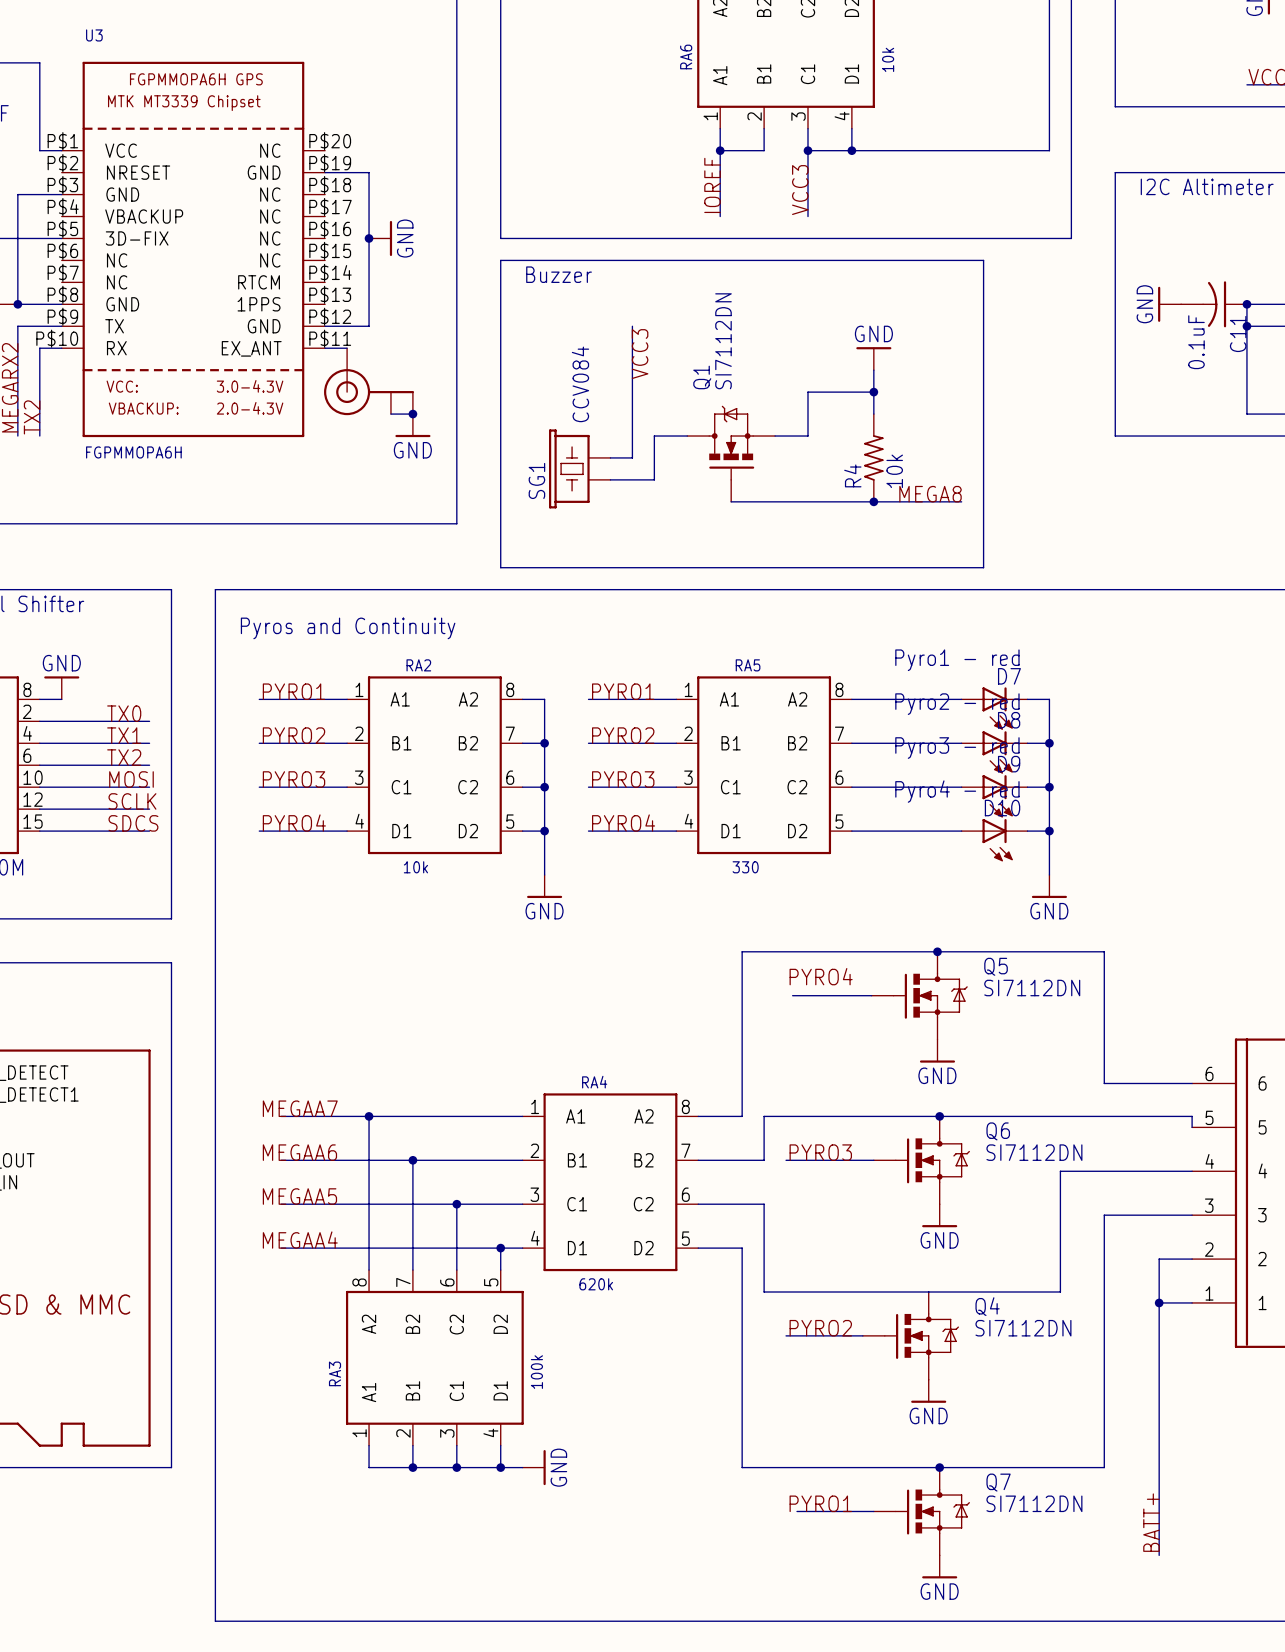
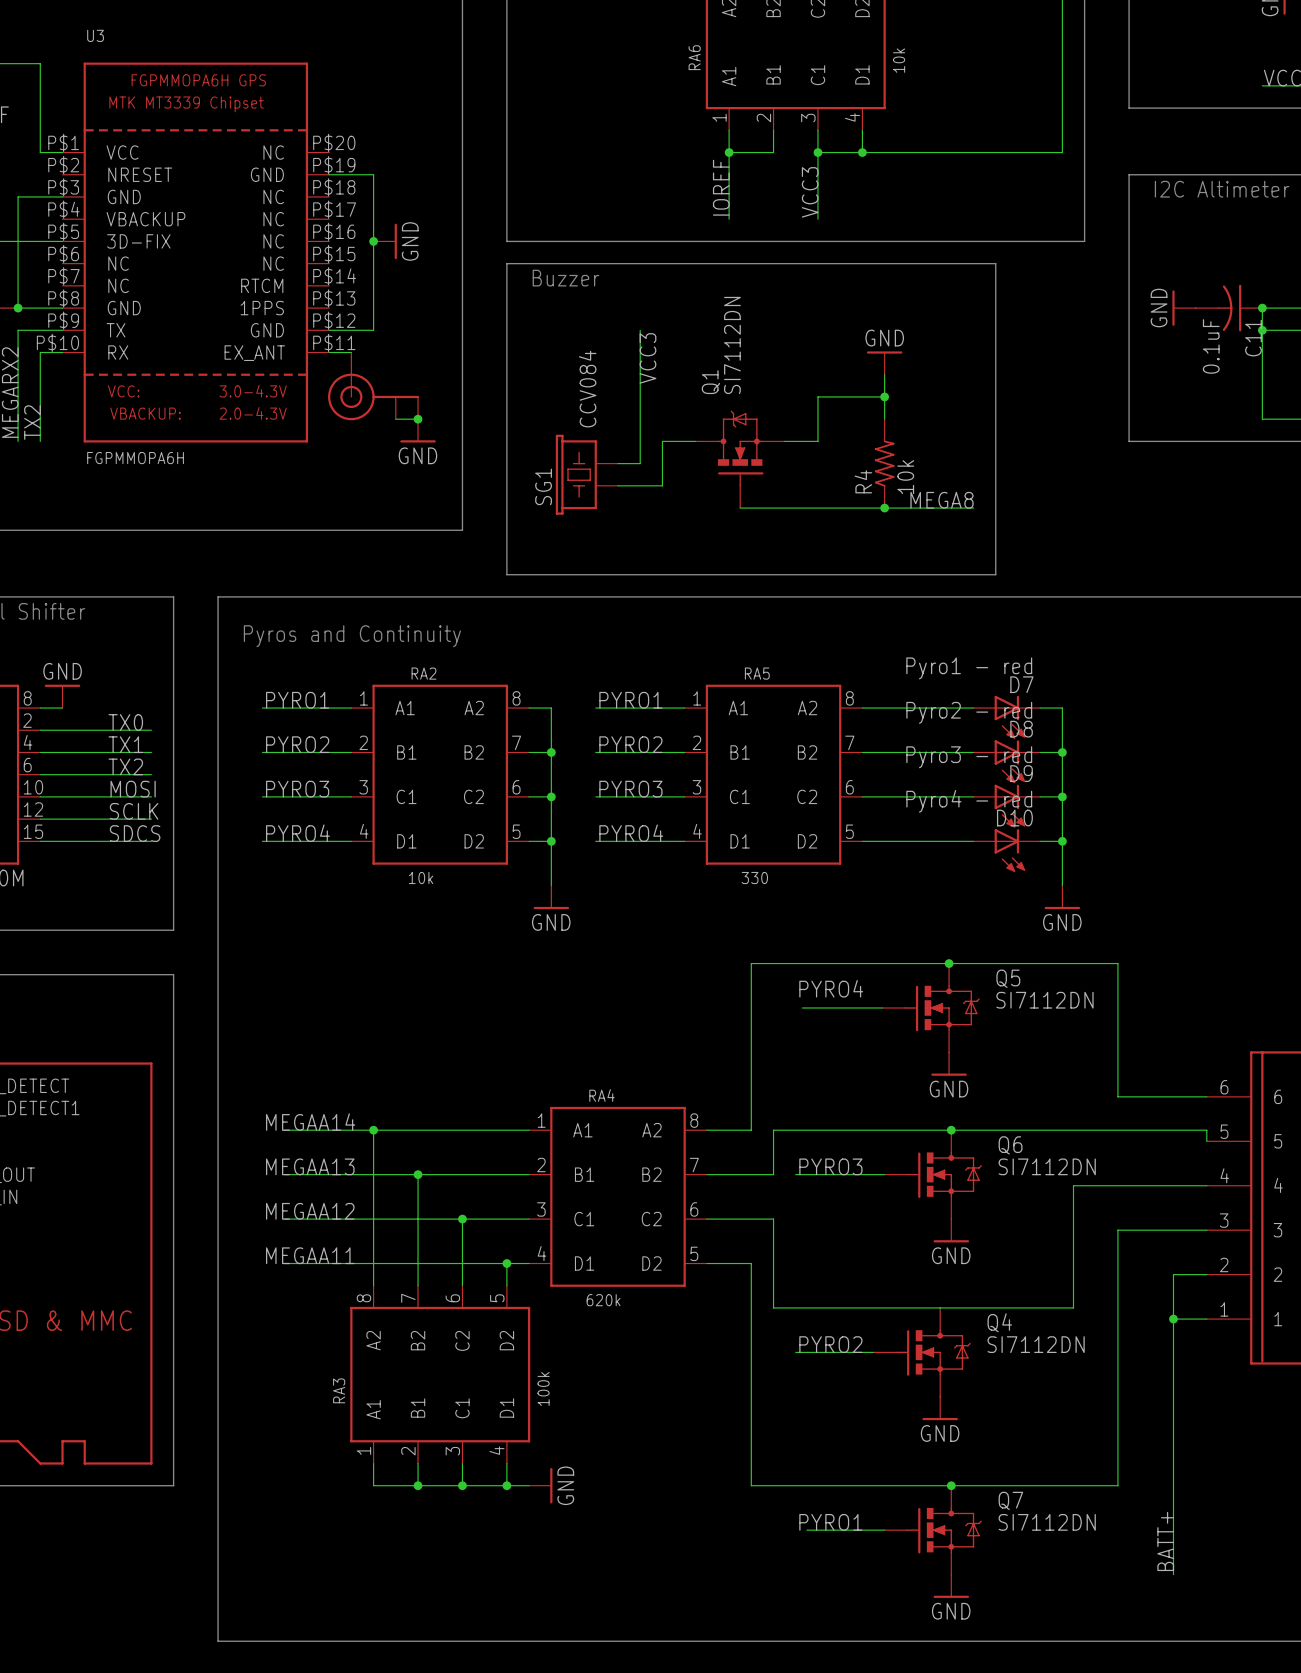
label: MEGAA7 (300, 1108) -> MEGAA14 (310, 1122)
label: MEGAA6 (299, 1152) -> MEGAA13 (310, 1166)
label: MEGAA5 (299, 1196) -> MEGAA12 (310, 1211)
label: MEGAA4 (300, 1240) -> MEGAA11 (310, 1255)

